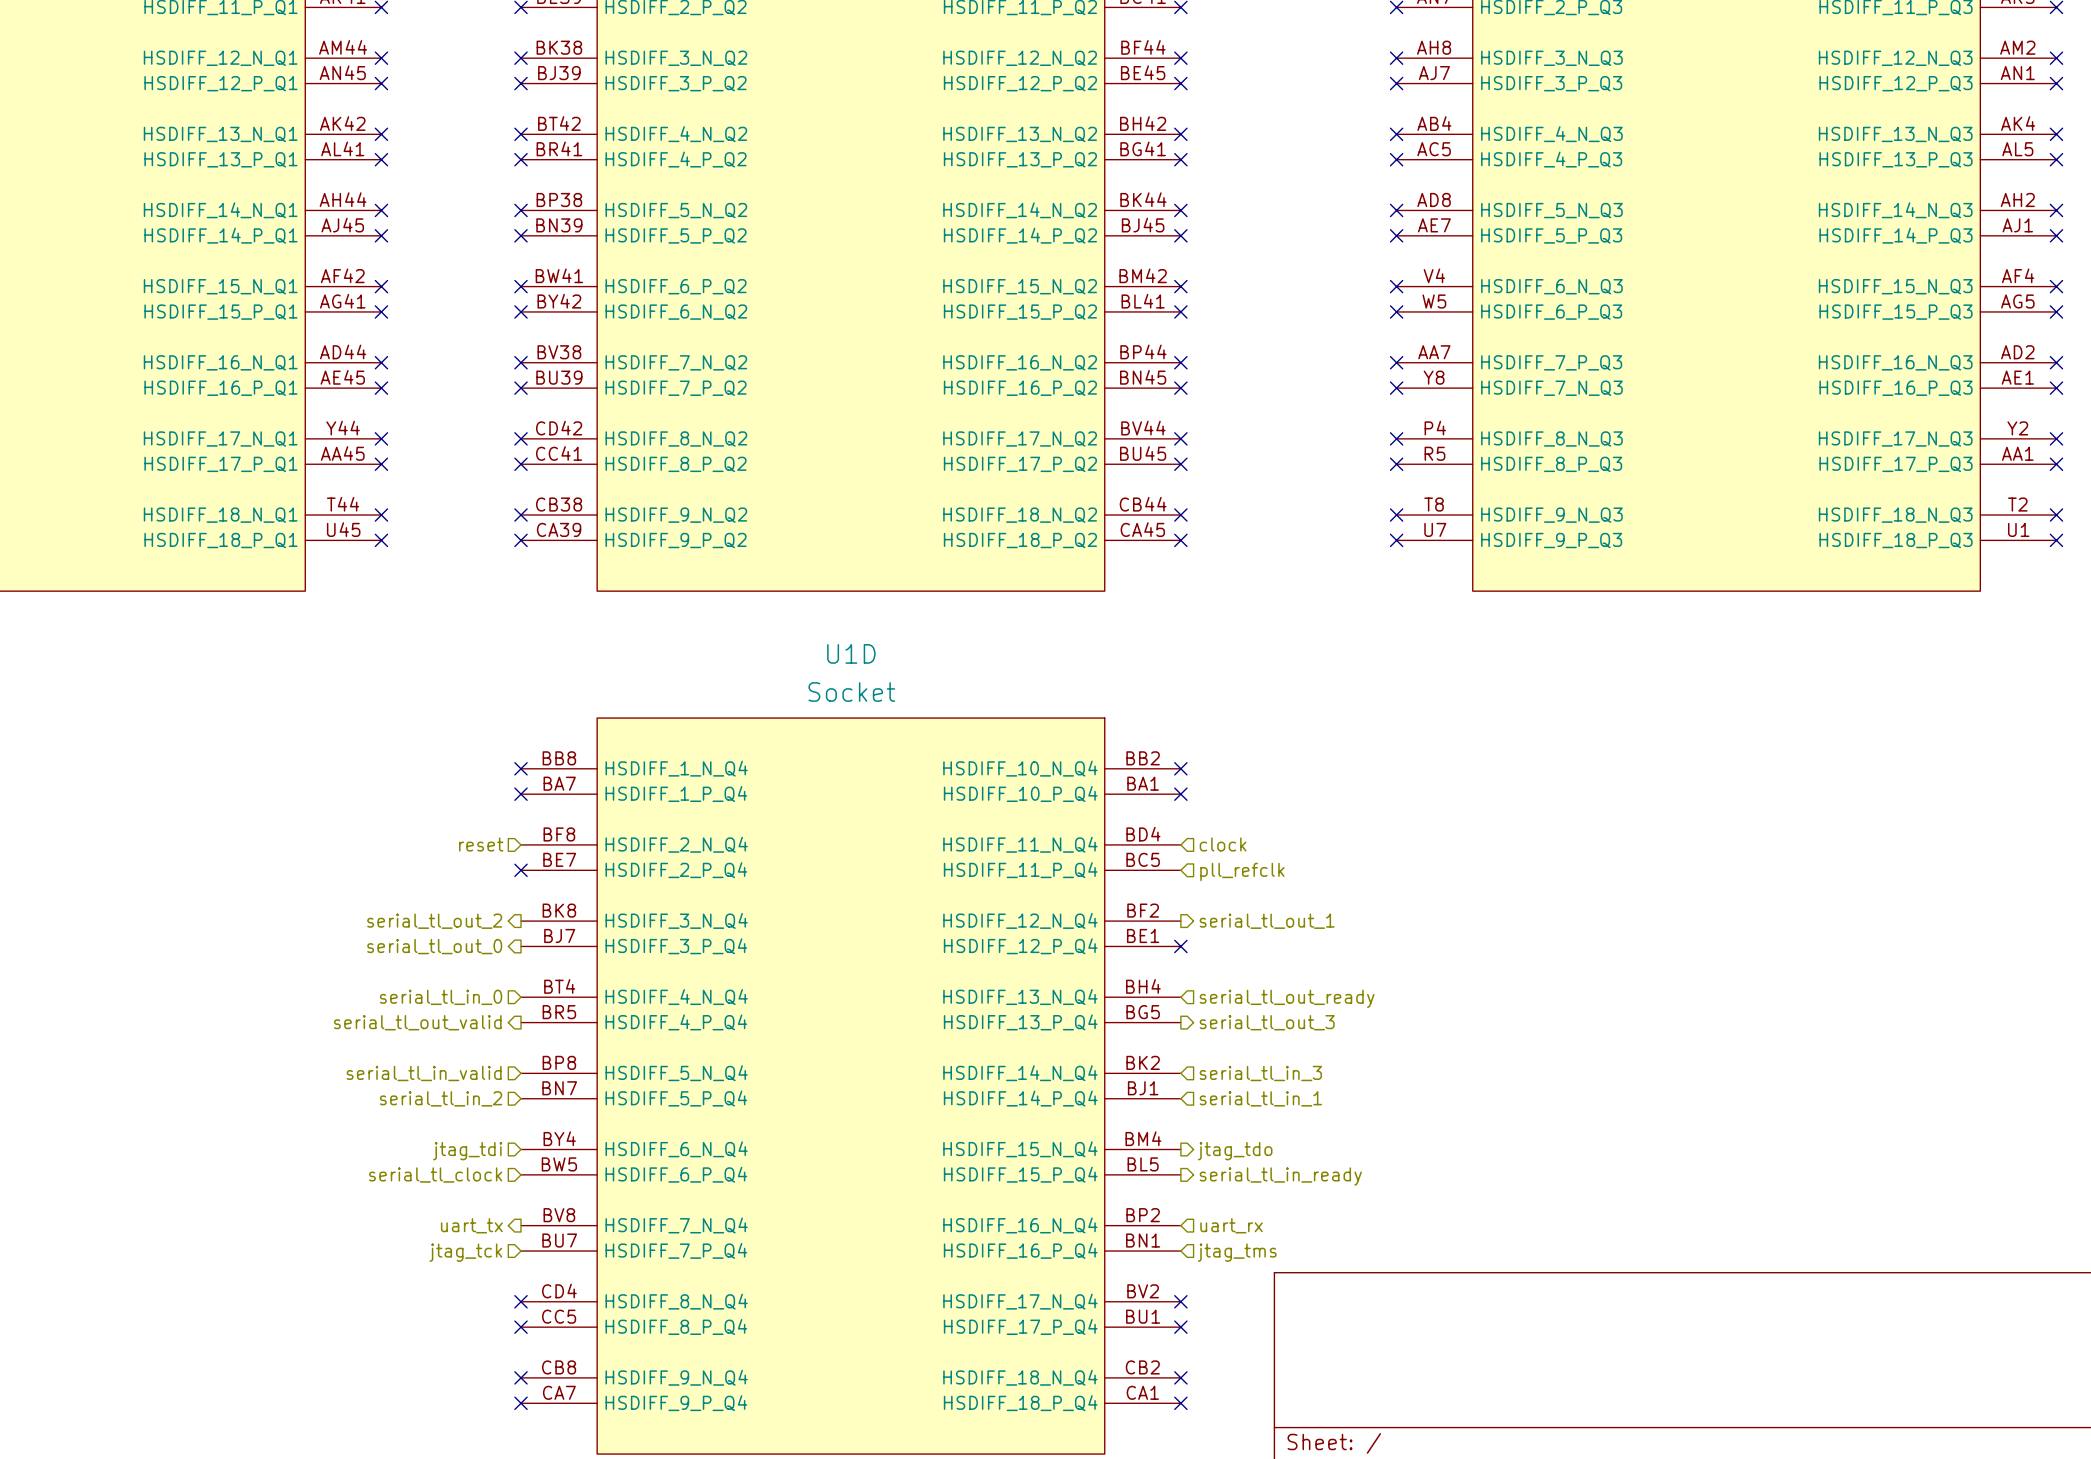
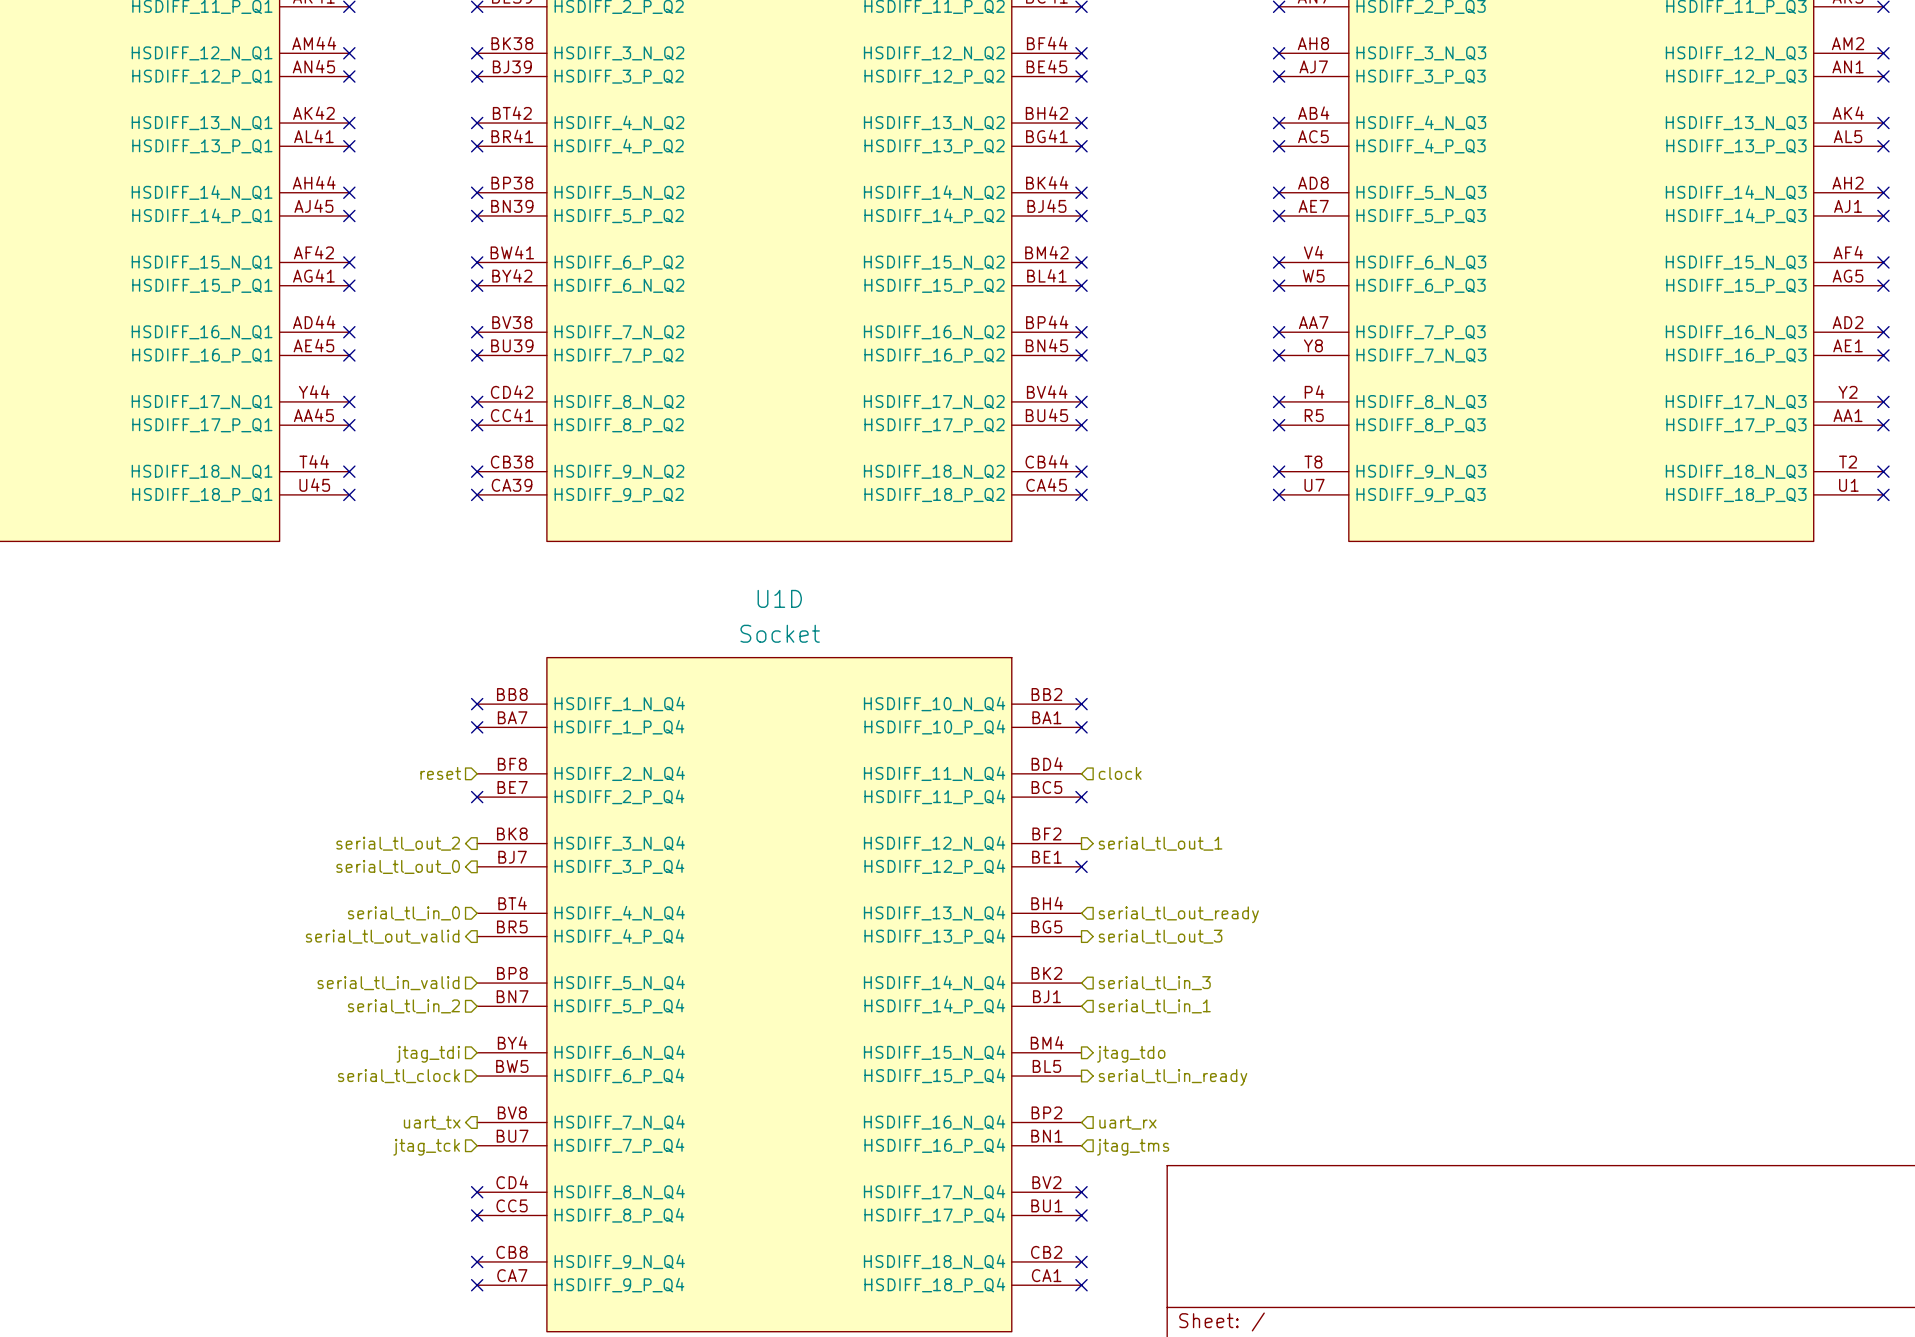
no-connect mark: none -> (1081, 797)
hierarchical label: pll_refclk (1242, 871) -> none

